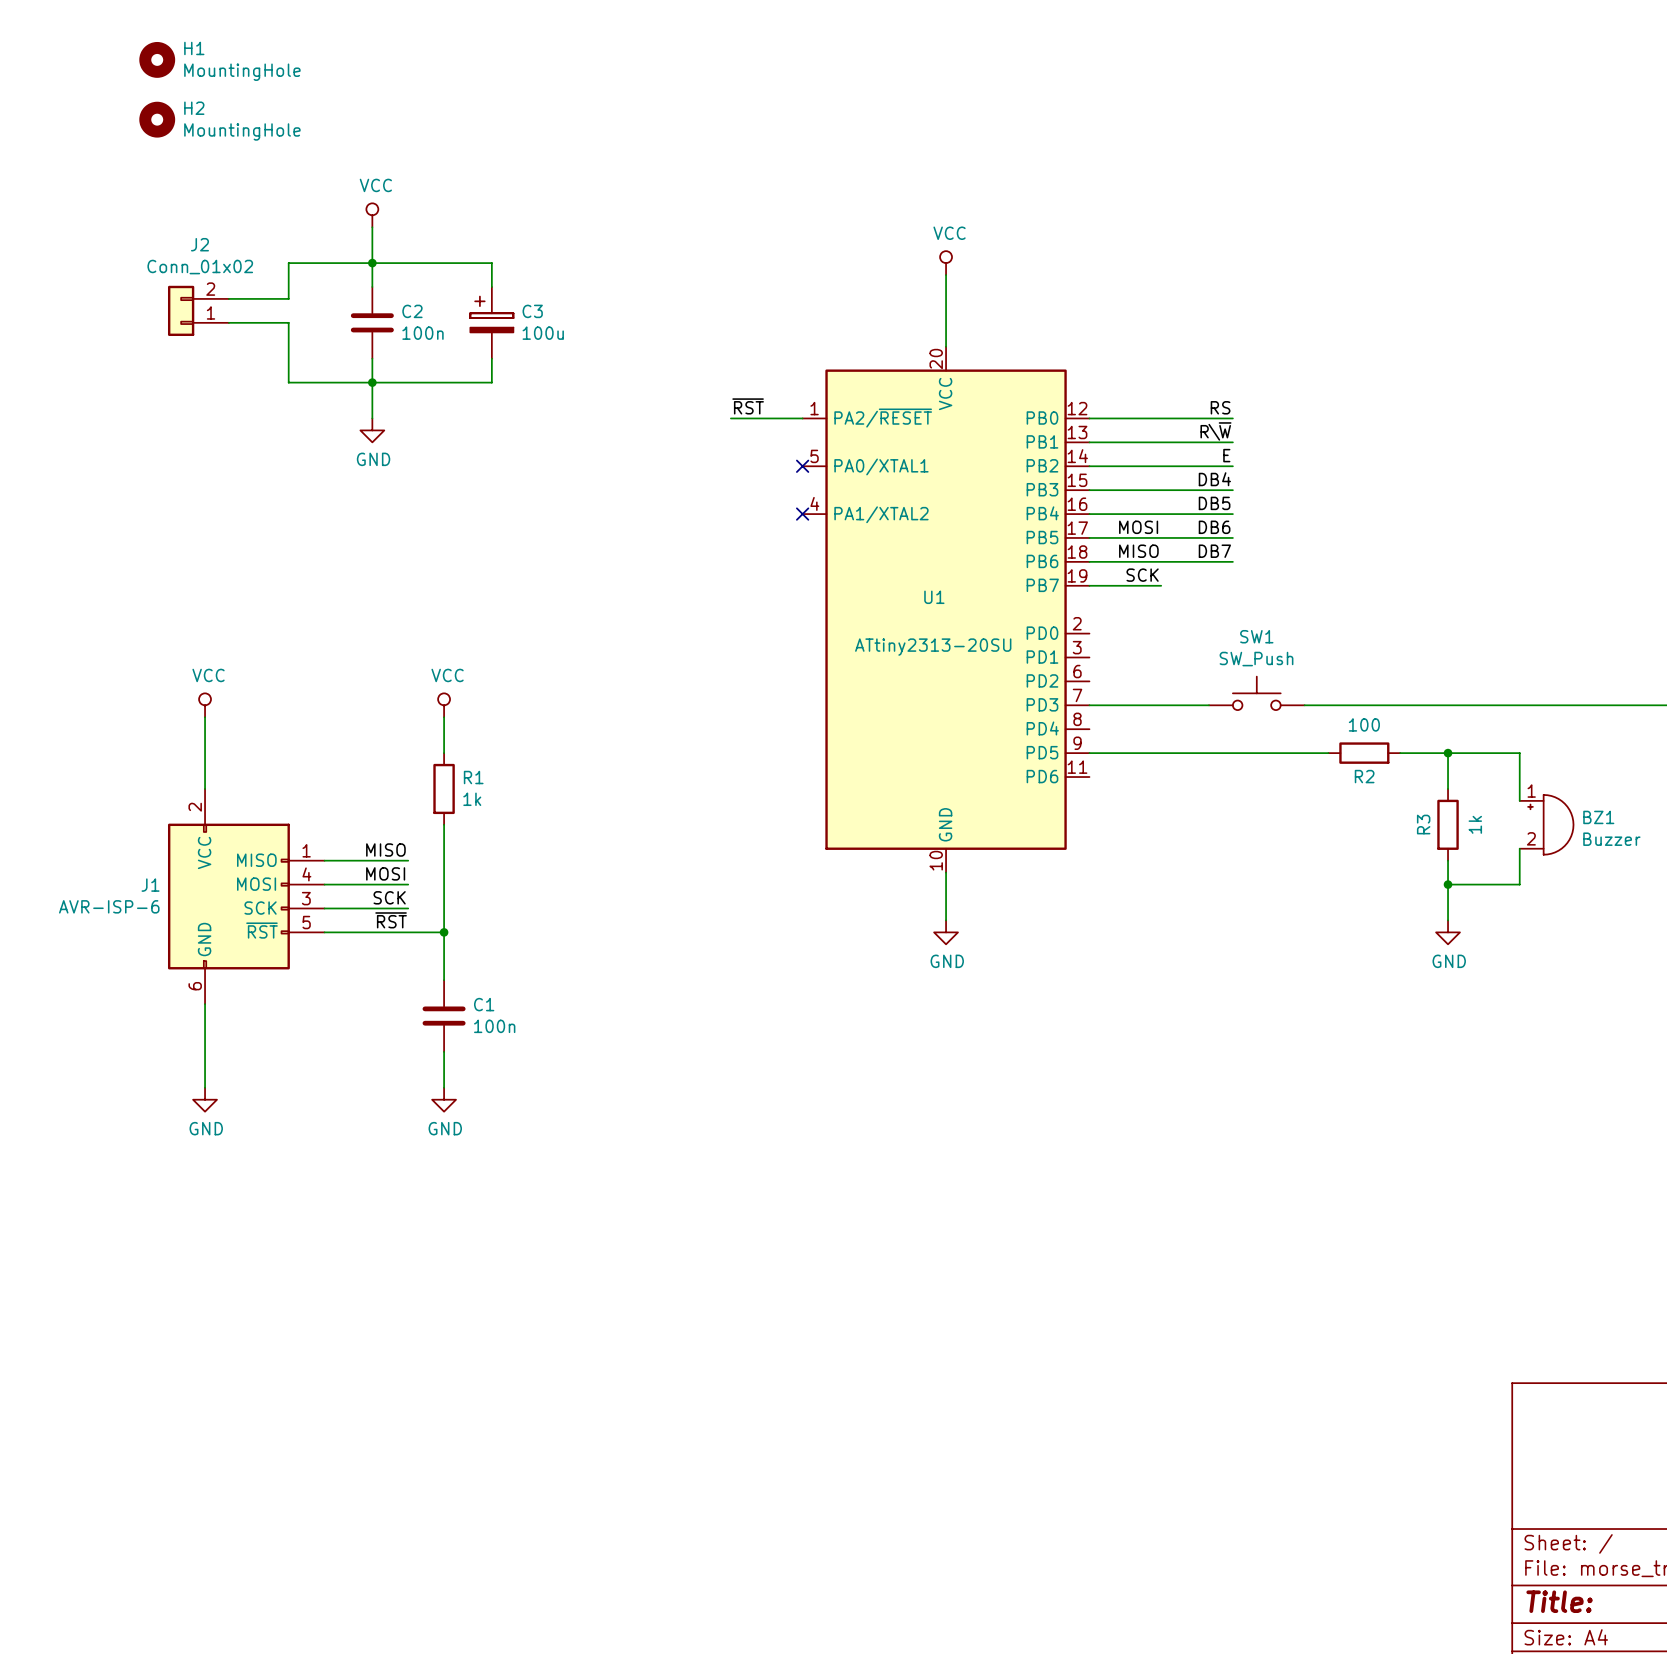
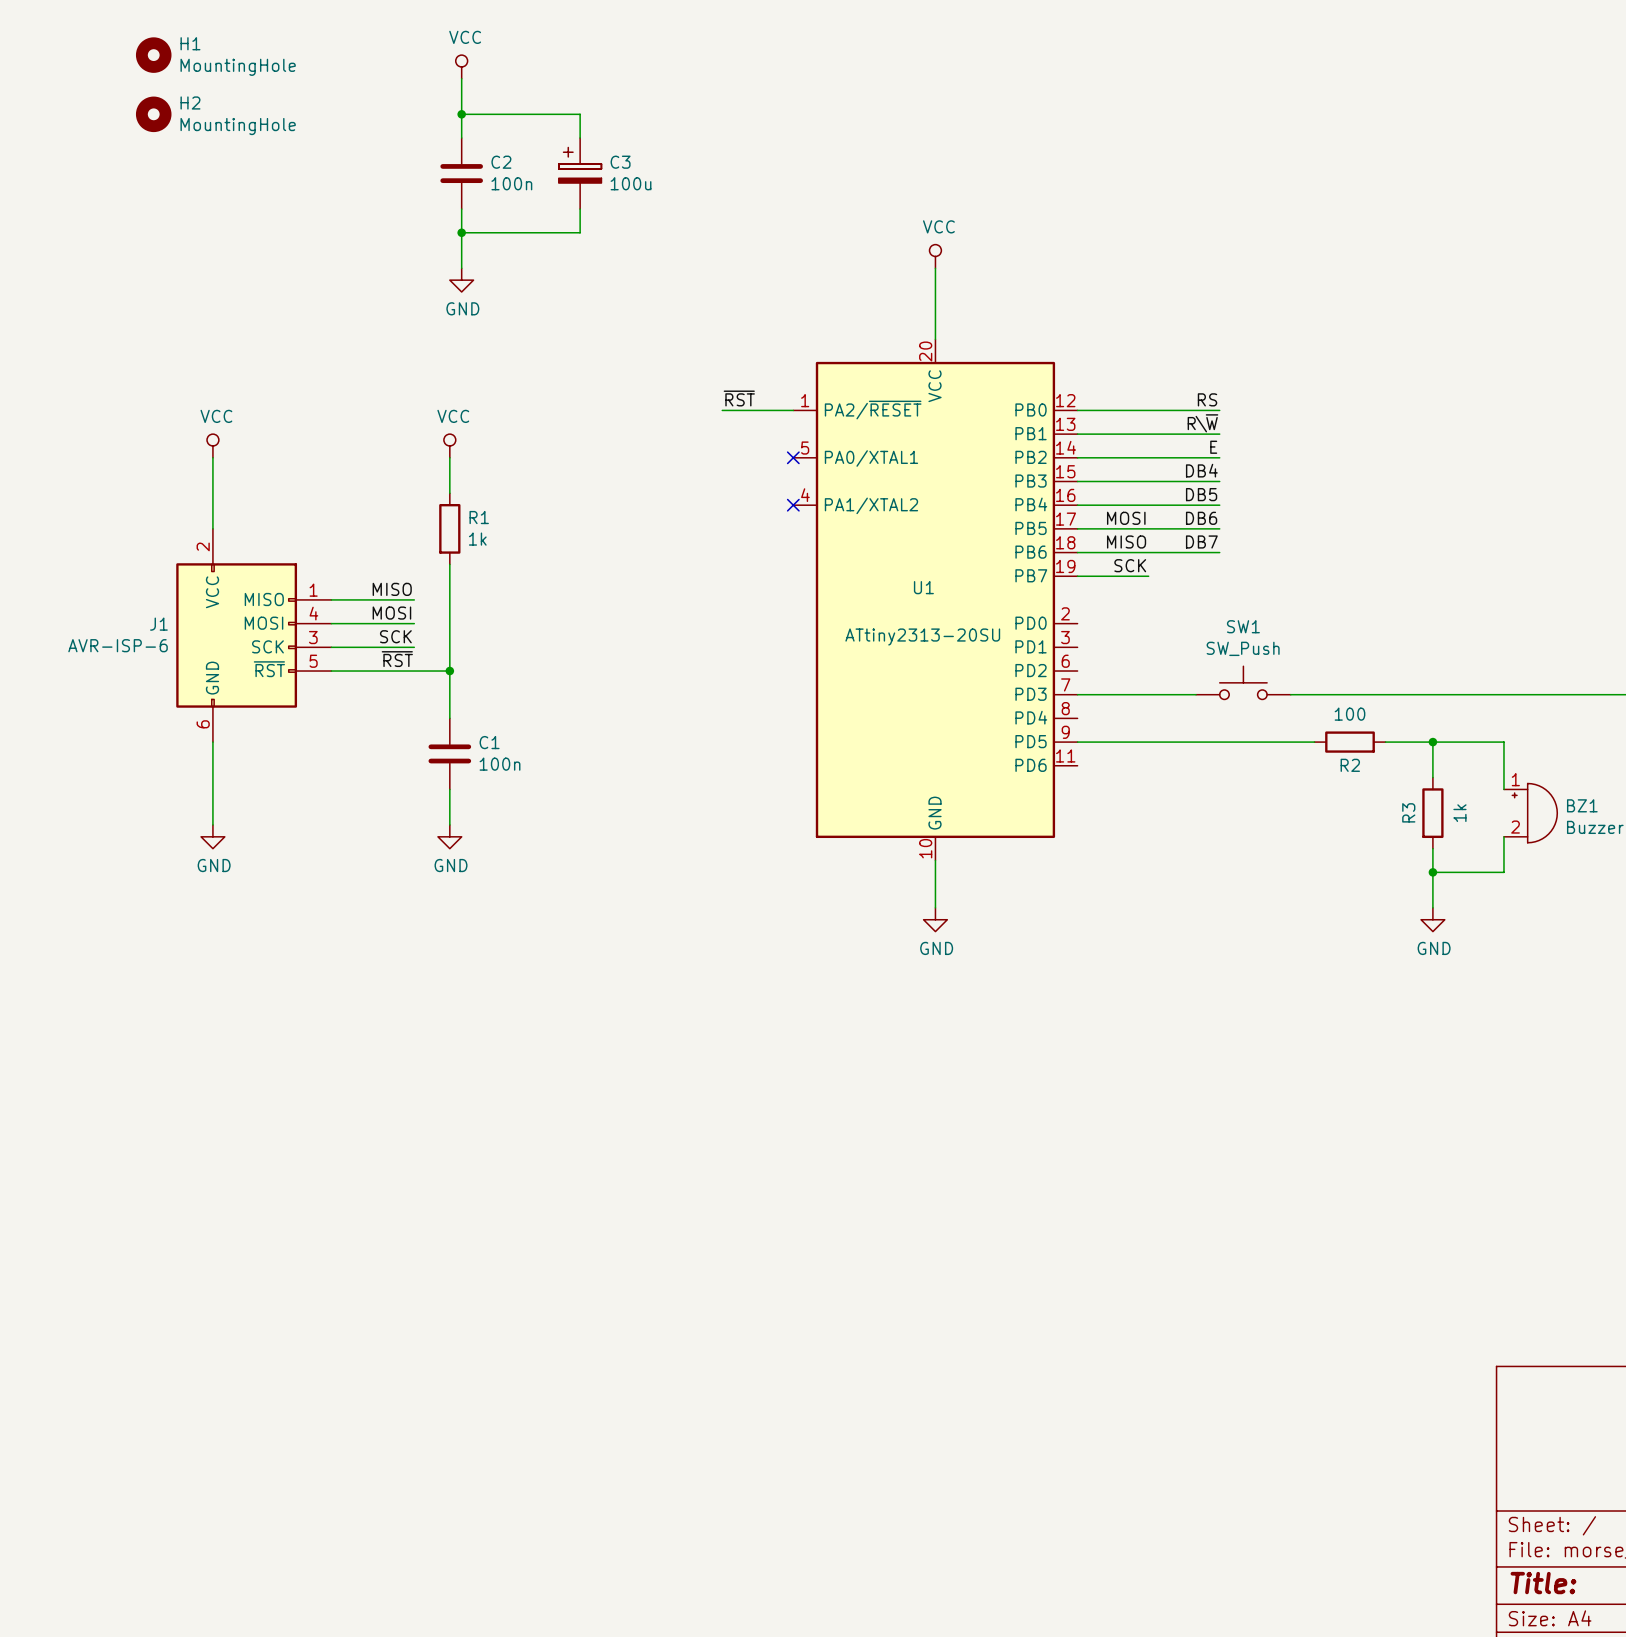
power symbol: none -> VCC (461, 66)
wire: none -> (461, 114) (580, 114) (580, 138)
junction: none -> (461, 114)
power symbol: VCC (372, 215) -> none
wire: none -> (580, 209) (580, 232) (461, 232)
wire: (372, 227) (372, 286) -> (461, 78) (461, 138)
junction: none -> (461, 232)
junction: (372, 263) -> none
wire: (491, 286) (491, 263) (288, 263) (288, 298) (228, 298) -> none
J2: Conn_01x02 (198, 310) -> none
wire: (228, 322) (288, 322) (288, 382) (491, 382) (491, 358) -> none
C2 position: (372, 322) -> (461, 173)
C3 position: (491, 322) -> (580, 173)
wire: (372, 358) (372, 418) -> (461, 209) (461, 268)
junction: (372, 382) -> none
power symbol position: GND (372, 430) -> GND (461, 280)
power symbol: none -> VCC (212, 445)
power symbol: none -> VCC (449, 445)
wire: none -> (212, 457) (212, 528)
wire: none -> (449, 457) (449, 493)
wire: none -> (449, 564) (449, 718)
label: none -> MISO (392, 589)
wire: none -> (331, 599) (414, 599)
label: none -> MOSI (391, 613)
label: none -> SCK (395, 636)
label: none -> ~{RST} (397, 659)
wire: none -> (331, 671) (449, 671)
junction: none -> (449, 671)
power symbol: VCC (205, 705) -> none
power symbol: VCC (444, 705) -> none
wire: (205, 717) (205, 788) -> none
wire: (444, 717) (444, 753) -> (449, 789) (449, 824)
wire: none -> (212, 742) (212, 824)
R1 position: (444, 788) -> (449, 528)
wire: (444, 824) (444, 980) -> none
power symbol: none -> GND (212, 836)
power symbol: none -> GND (449, 836)
label: MISO (385, 850) -> none
wire: (324, 860) (408, 860) -> (331, 623) (414, 623)
label: MOSI (385, 873) -> none
wire: (324, 884) (408, 884) -> (331, 647) (414, 647)
J1 position: (246, 896) -> (253, 635)
label: SCK (389, 897) -> none
wire: (324, 908) (408, 908) -> none
label: ~{RST} (391, 920) -> none
wire: (324, 932) (444, 932) -> none
junction: (444, 932) -> none
wire: (205, 1004) (205, 1087) -> none
C1 position: (444, 1016) -> (449, 753)
wire: (444, 1051) (444, 1087) -> none
power symbol: GND (205, 1099) -> none
power symbol: GND (444, 1099) -> none

